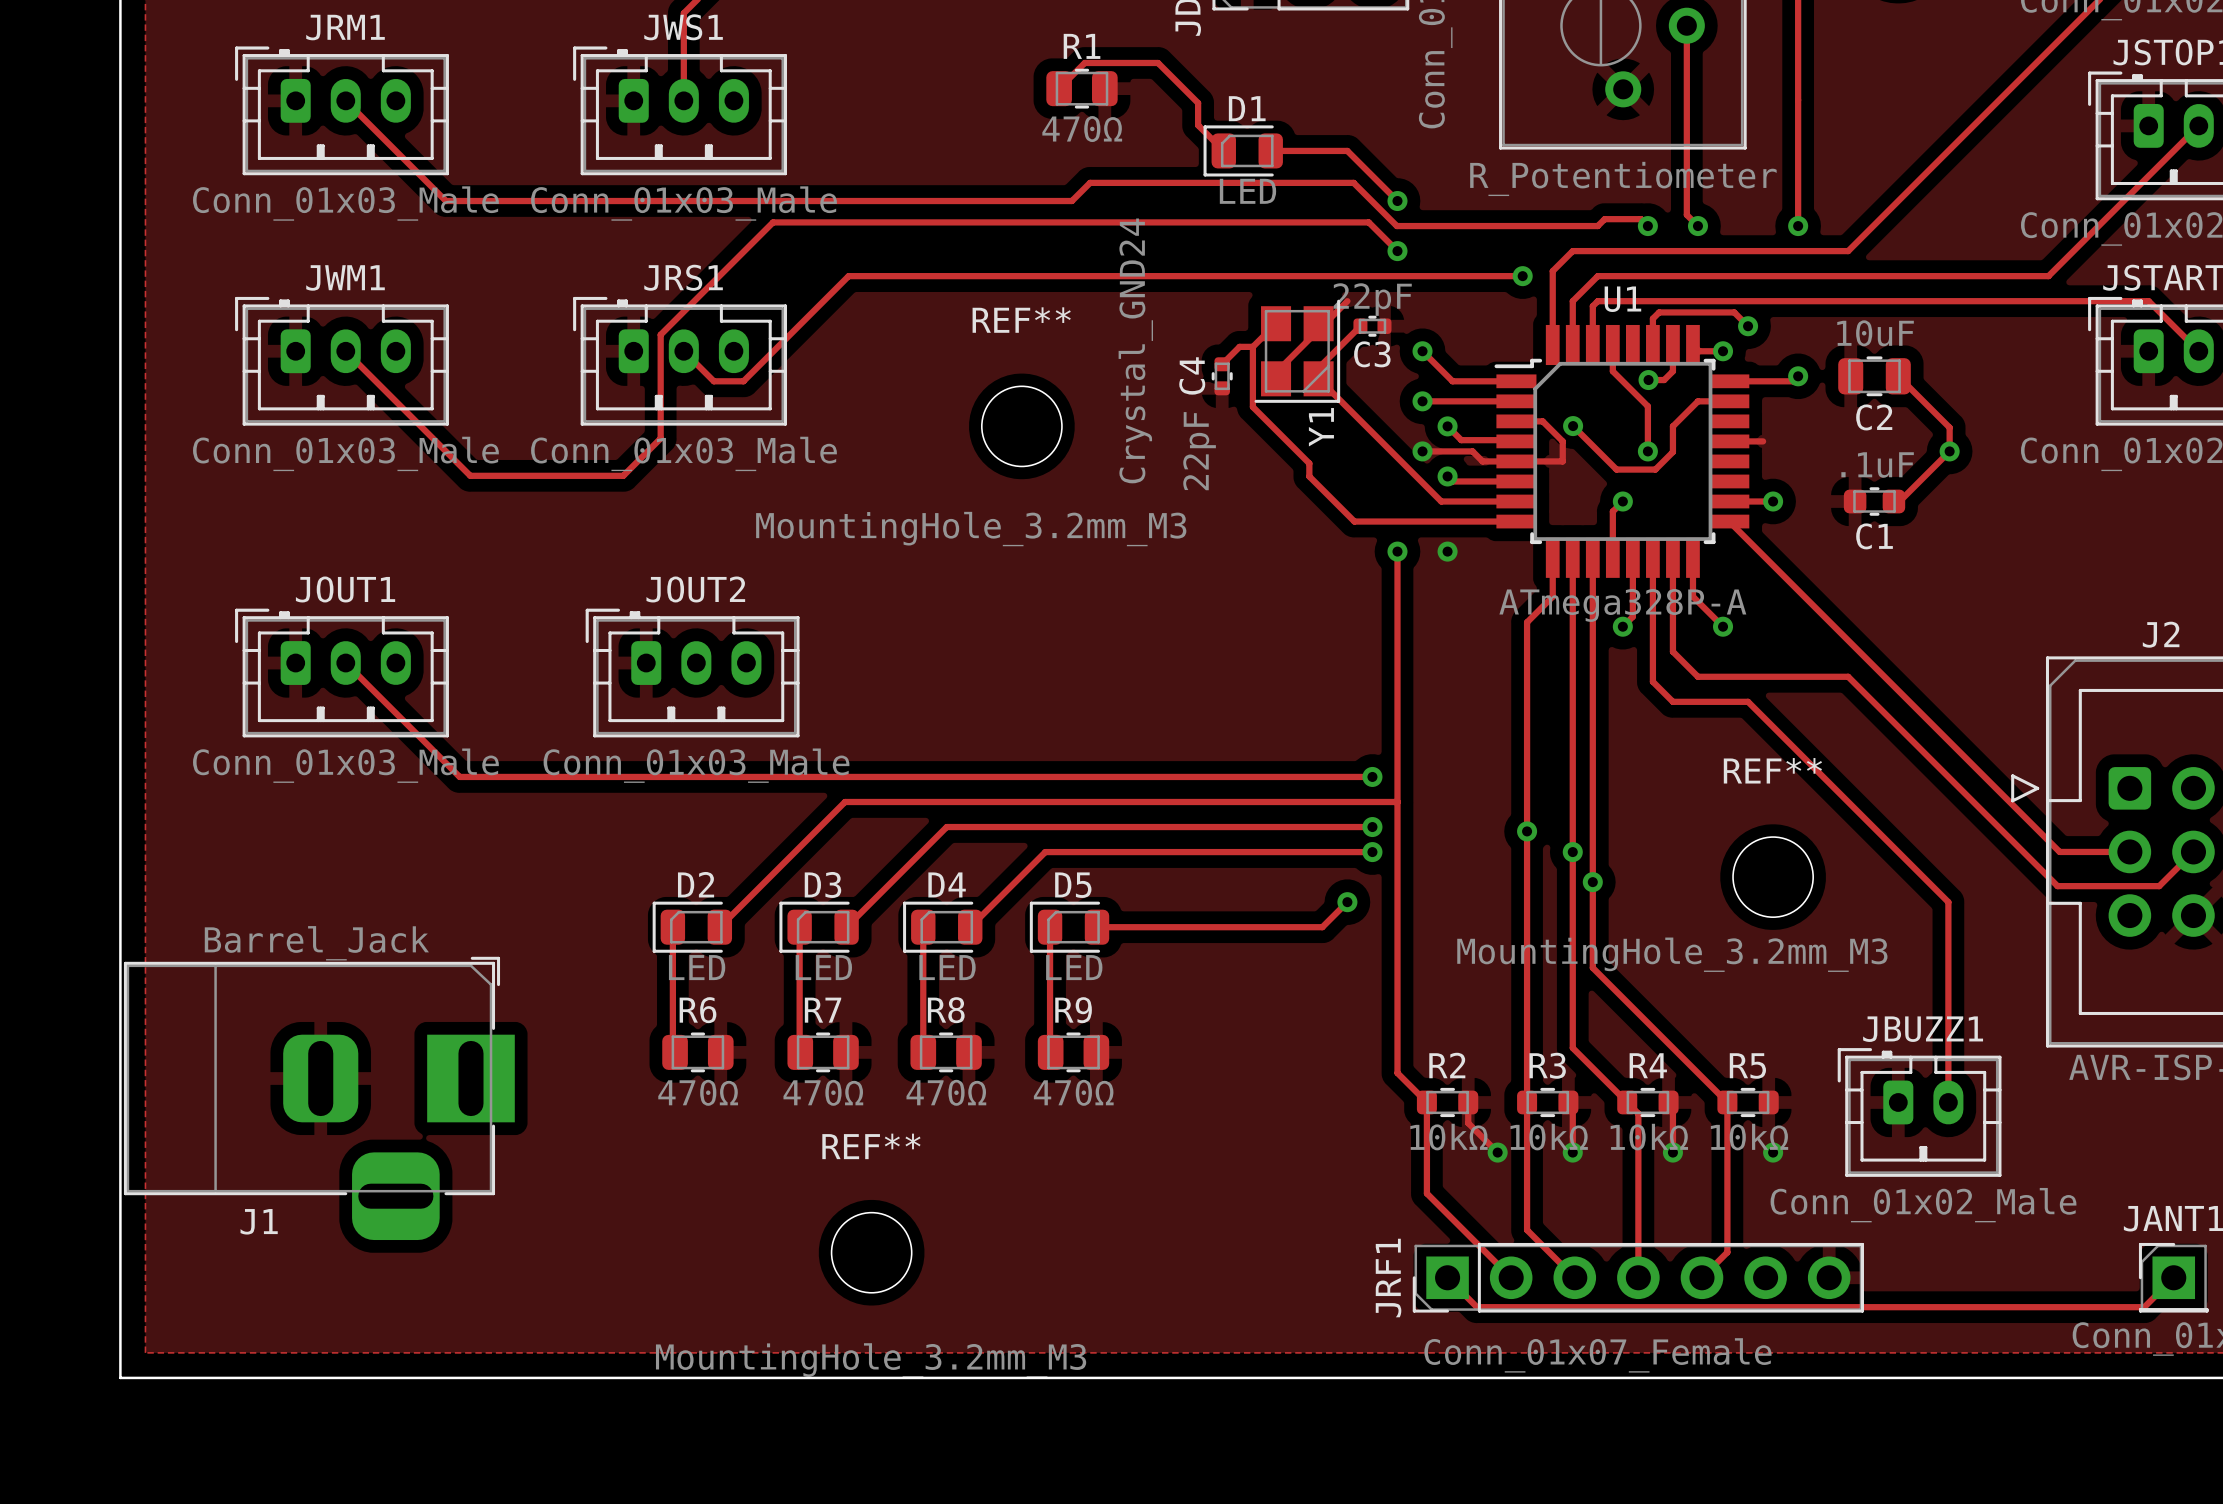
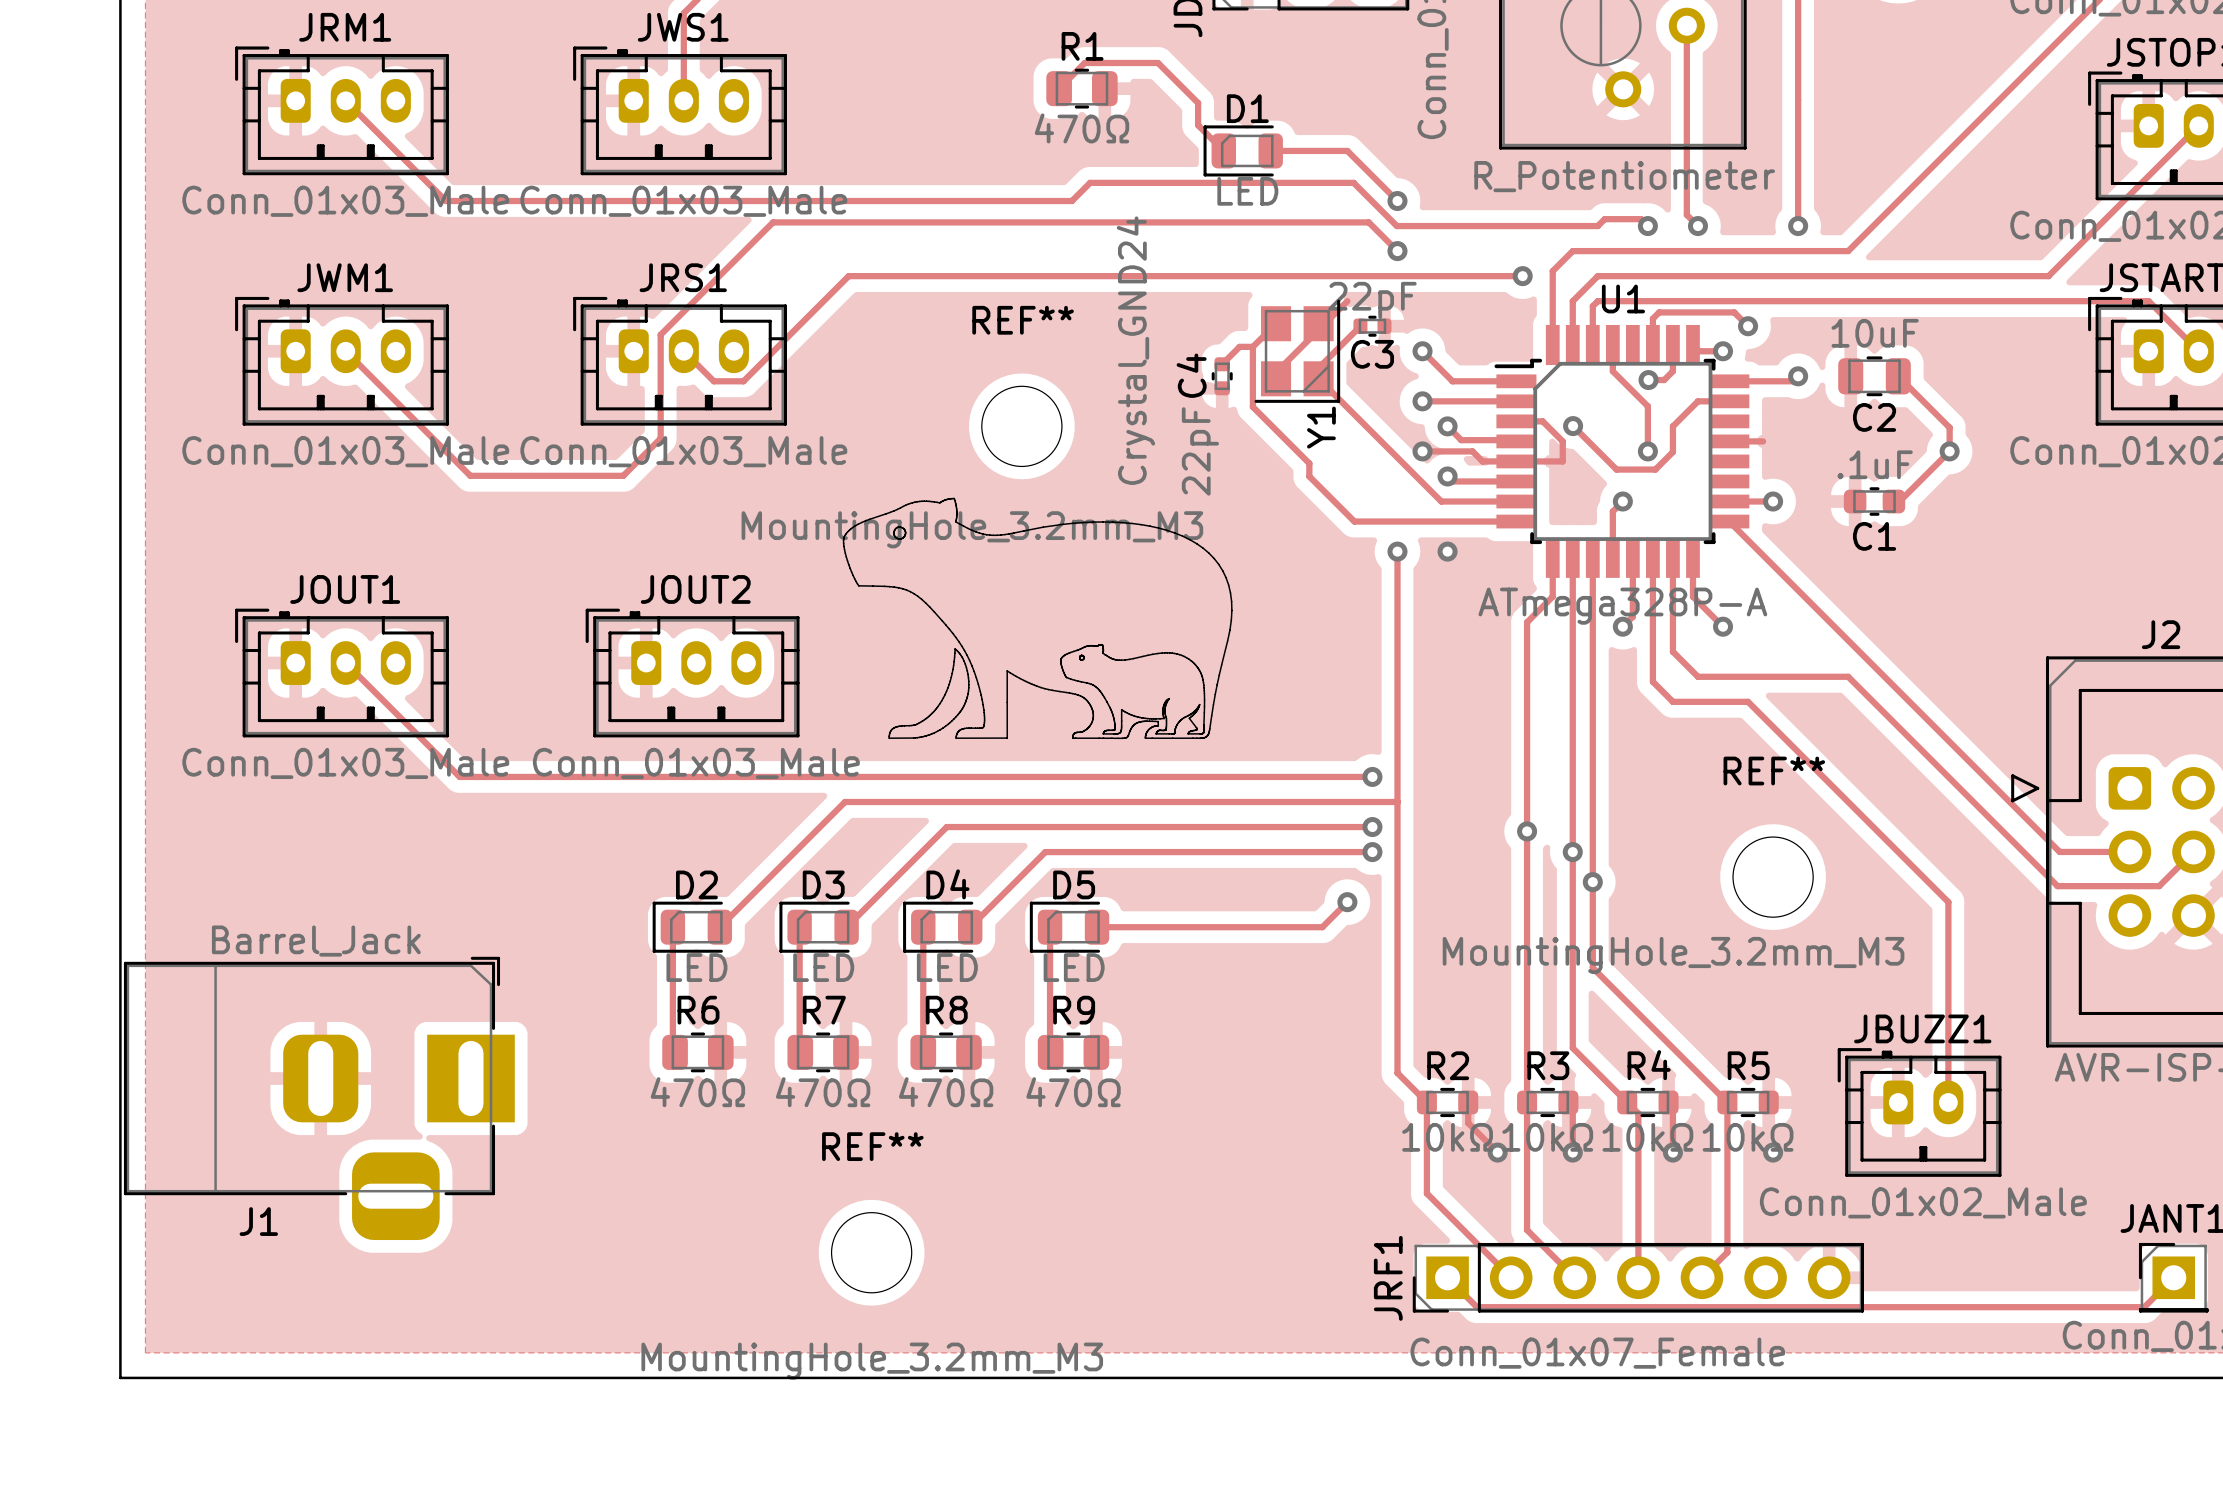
line: none -> (898, 527) (894, 529) (894, 534) (896, 538) (900, 538) (904, 536) (905, 531) (898, 527)
line: none -> (1102, 644) (1103, 651)
line: none -> (1096, 646) (1085, 646) (1066, 654) (1061, 659)
line: none -> (955, 648) (950, 680) (937, 706) (928, 716) (916, 724) (893, 728) (890, 731) (889, 738) (915, 737) (929, 734) (945, 726) (960, 711) (967, 696) (968, 681) (964, 661) (955, 648)
line: none -> (1103, 653) (1112, 659) (1121, 660) (1169, 652) (1181, 655) (1190, 660) (1198, 668) (1203, 680) (1204, 731)
line: none -> (1060, 660) (1066, 677) (1091, 684) (1099, 690) (1112, 712) (1114, 729)
line: none -> (1196, 708) (1199, 704) (1196, 711) (1189, 718) (1196, 727)
line: none -> (1194, 711) (1180, 720) (1175, 729)
line: none -> (1166, 728) (1165, 709) (1169, 698) (1163, 706) (1164, 718) (1139, 717) (1121, 709) (1120, 731)
line: none -> (1114, 730) (1107, 730)
line: none -> (1160, 730) (1163, 730)
line: none -> (1174, 730) (1174, 732)
line: none -> (1196, 730) (1191, 731)
line: none -> (1082, 731) (1090, 725) (1093, 716) (1091, 706) (1085, 698) (1075, 694) (1037, 686) (1007, 670) (1007, 738) (956, 738) (960, 729) (982, 727) (984, 724) (980, 691) (967, 655) (946, 625) (925, 603) (914, 593) (894, 587) (858, 585) (850, 568) (844, 549) (843, 538) (847, 532) (861, 522) (910, 503) (924, 501) (939, 502) (954, 498) (956, 510) (955, 521) (986, 534) (1004, 534) (1073, 523) (1112, 522) (1158, 528) (1190, 539) (1208, 553) (1218, 564) (1228, 585) (1231, 601) (1229, 630) (1206, 736)
line: none -> (1081, 732) (1076, 732)
line: none -> (1156, 732) (1173, 733)
line: none -> (1119, 733) (1103, 733)
line: none -> (1188, 733) (1201, 733)
line: none -> (1073, 735) (1072, 738) (1125, 738) (1135, 723) (1149, 721) (1158, 721) (1158, 725) (1149, 729) (1145, 738) (1206, 737)

